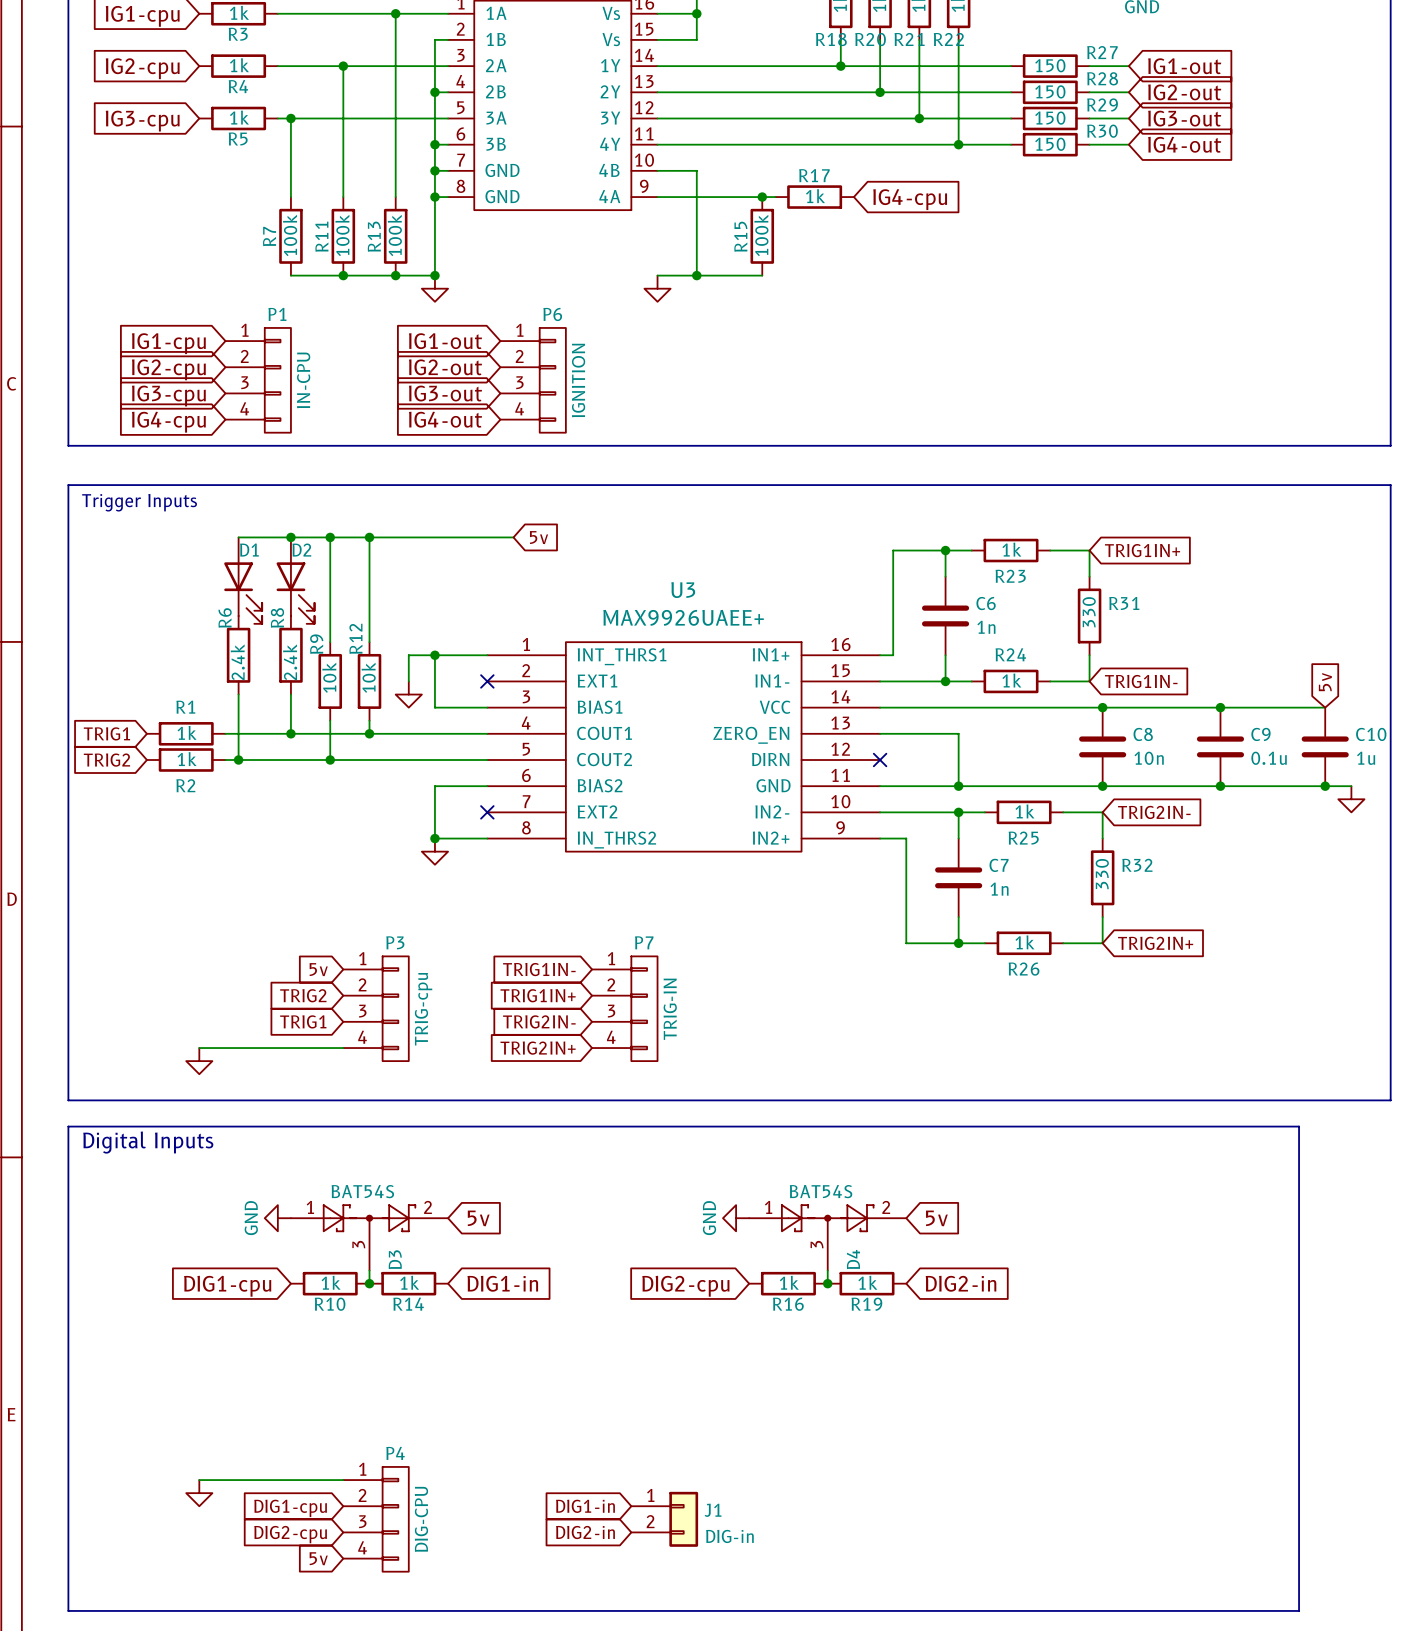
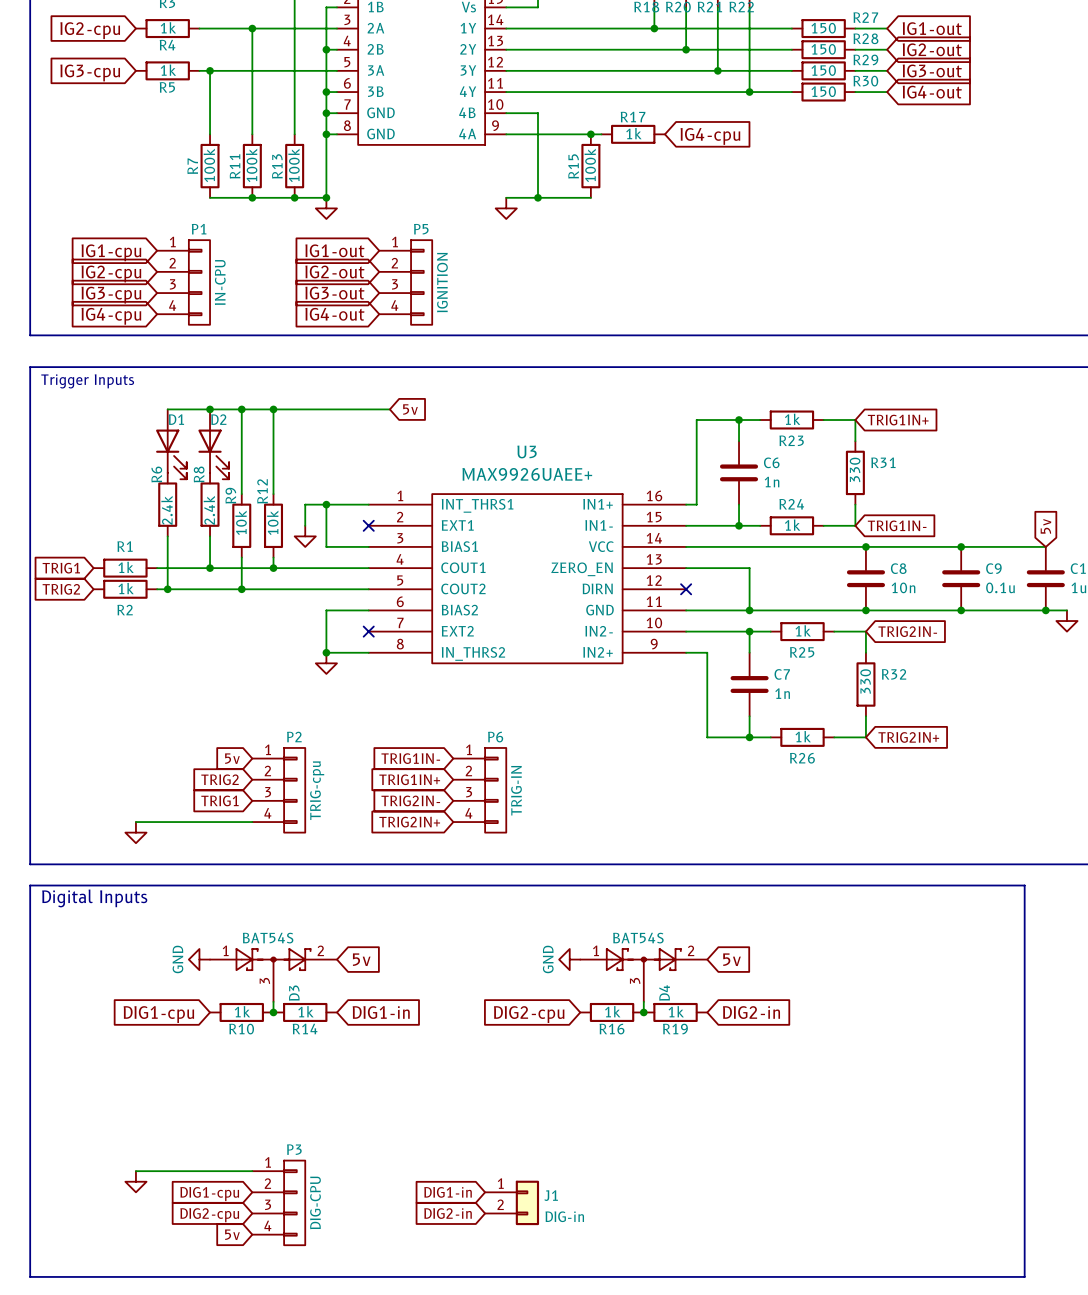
P6 name: P6 (552, 314) -> P5 (421, 229)
P3 name: P3 (395, 942) -> P2 (294, 737)
P7 name: P7 (644, 942) -> P6 (495, 737)
P4 name: P4 (395, 1453) -> P3 (294, 1149)

